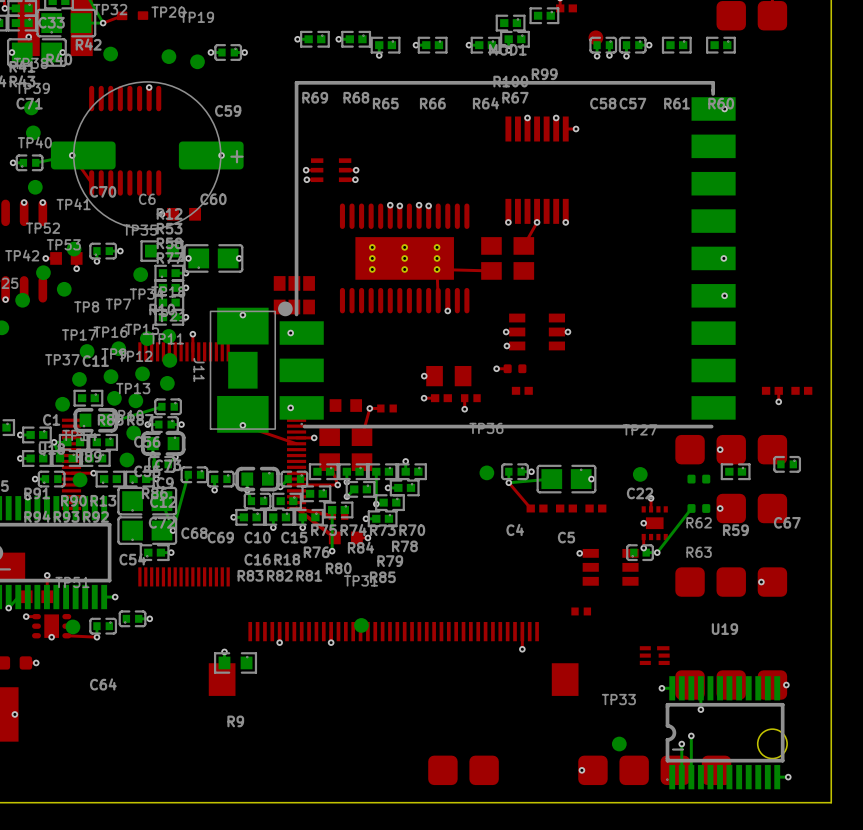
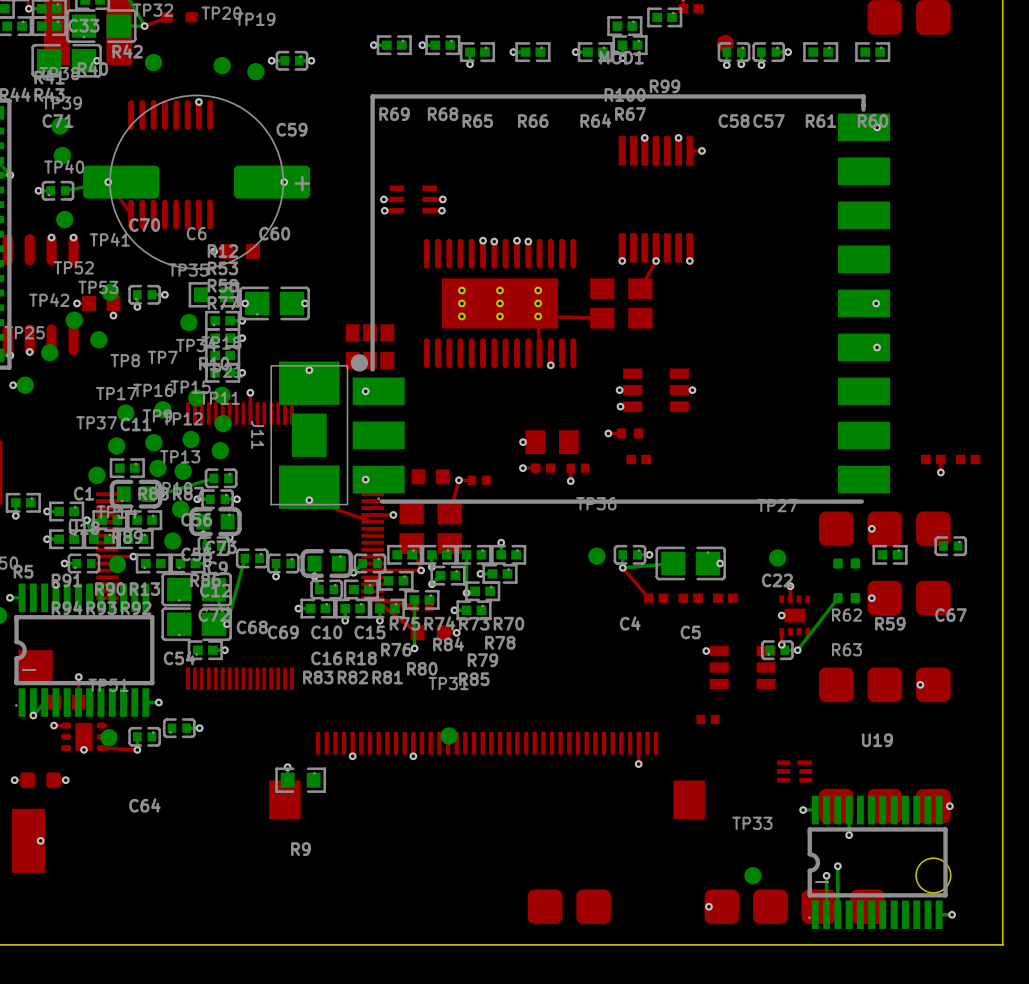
via: (28, 36) -> none
via: (11, 52) -> none

